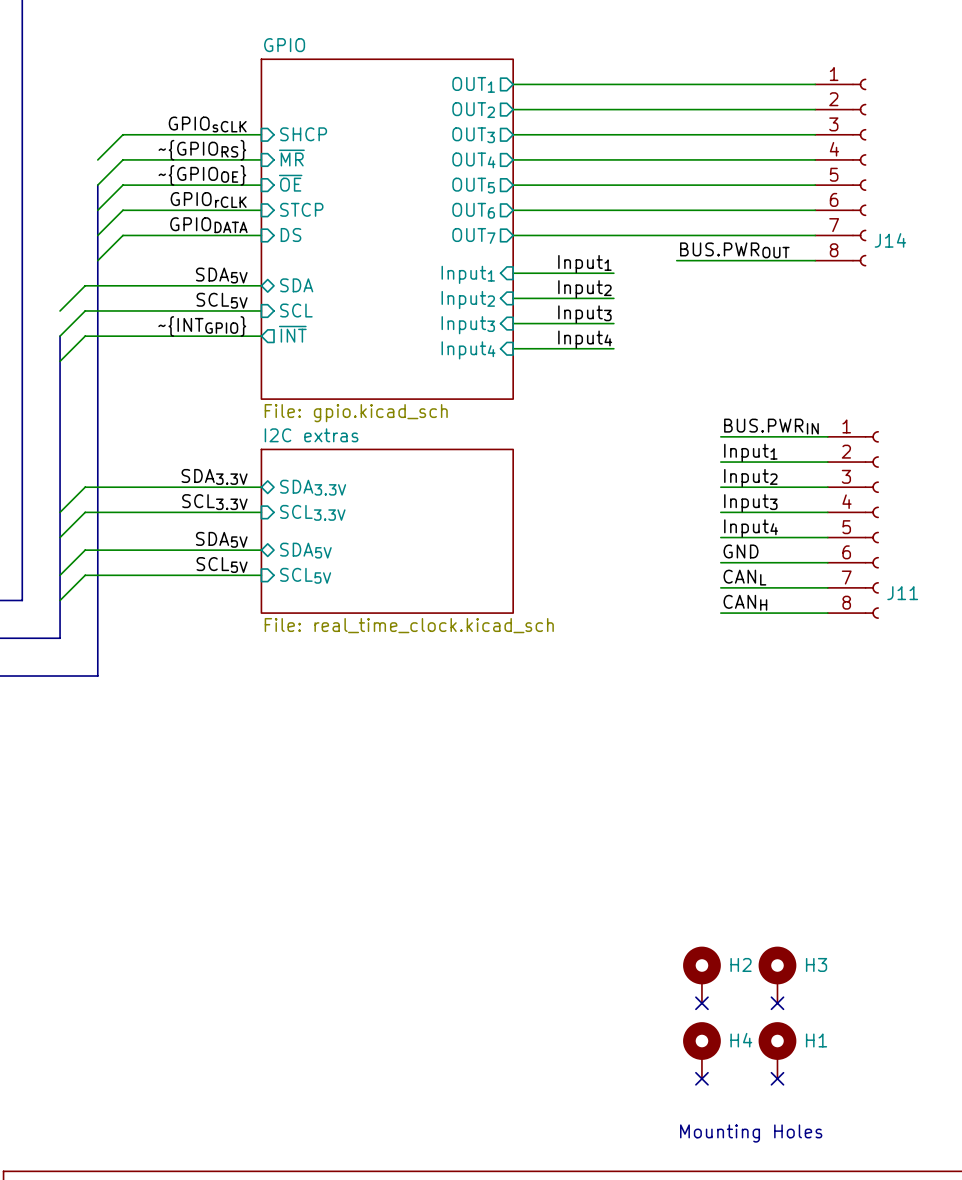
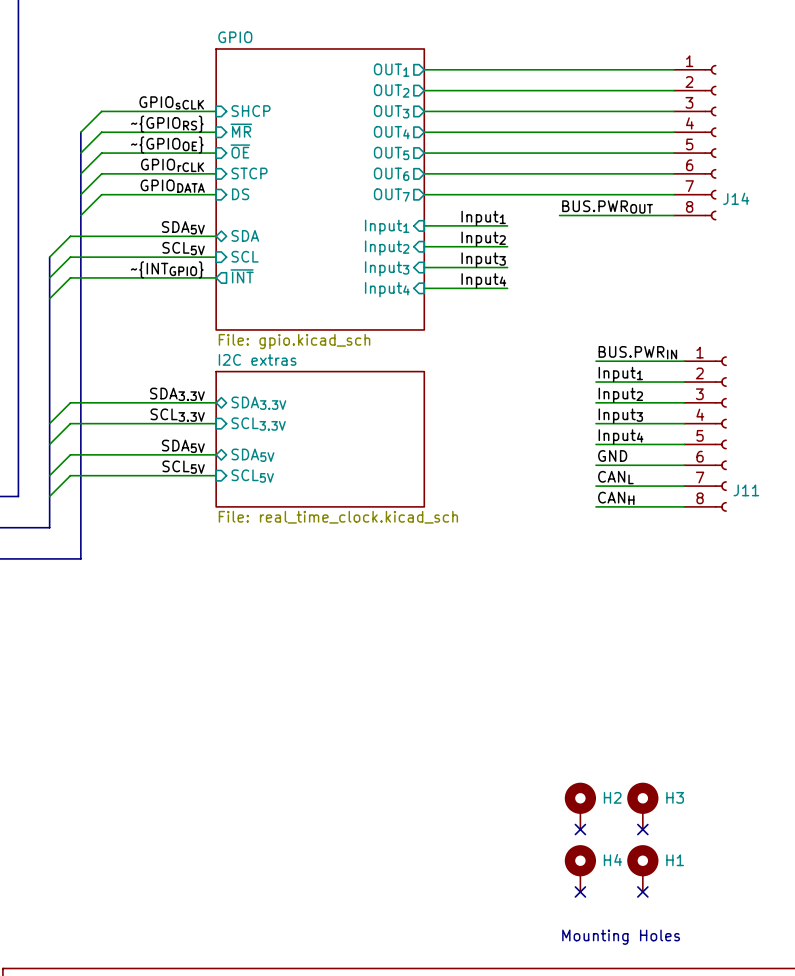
bus: none -> (80, 132) (80, 153)
bus: none -> (49, 257) (49, 277)

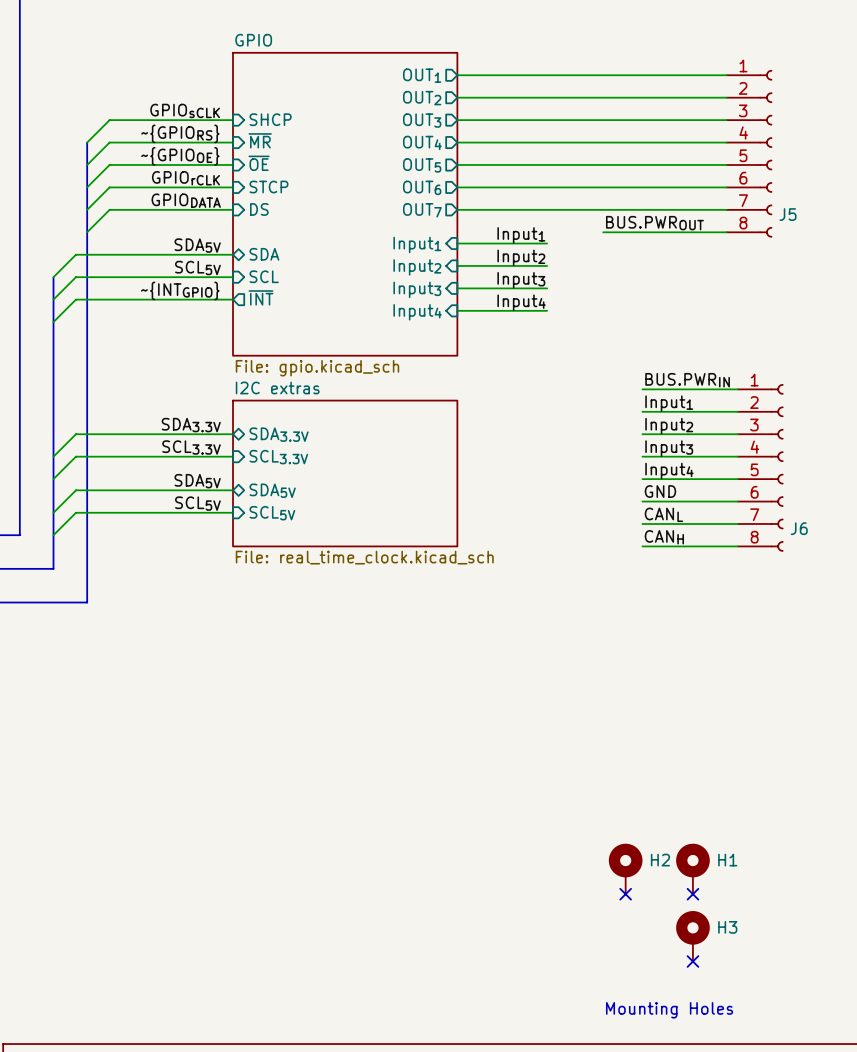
J14 name: J14 (736, 198) -> J5 (788, 214)
J11 name: J11 (746, 490) -> J6 (799, 528)
H3 name: H3 (675, 797) -> H1 (727, 860)
H1 name: H1 (675, 860) -> H3 (727, 927)
H4: (580, 868) -> none
no-connect mark: (580, 891) -> none

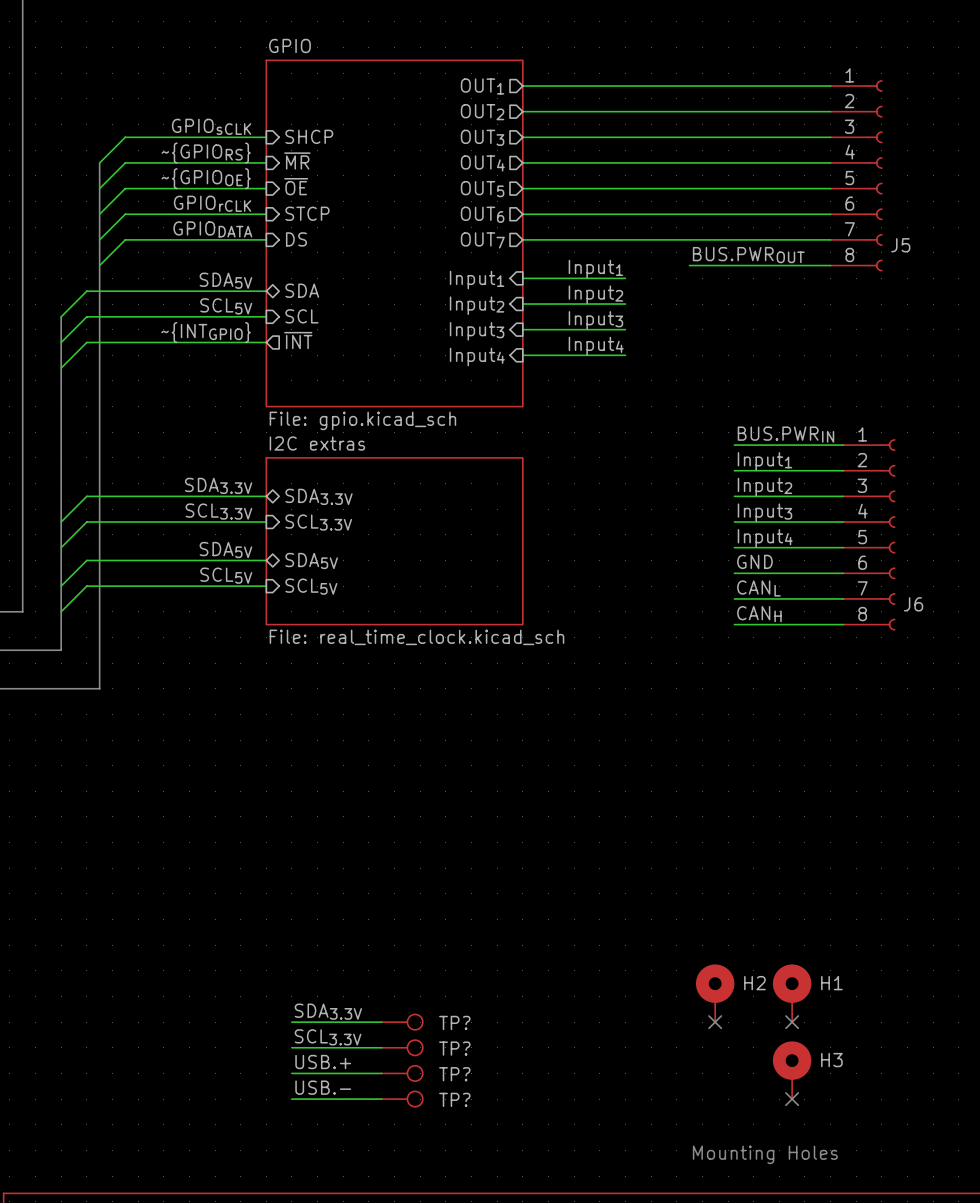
label: none -> SDA3.3V (328, 1011)
wire: none -> (291, 1022) (381, 1022)
TP?: none -> (402, 1022)
label: none -> SCL3.3V (328, 1037)
wire: none -> (291, 1047) (381, 1047)
TP?: none -> (402, 1047)
label: none -> USB.+ (323, 1061)
wire: none -> (291, 1073) (381, 1073)
TP?: none -> (402, 1073)
label: none -> USB.- (323, 1087)
wire: none -> (291, 1099) (381, 1099)
TP?: none -> (402, 1099)

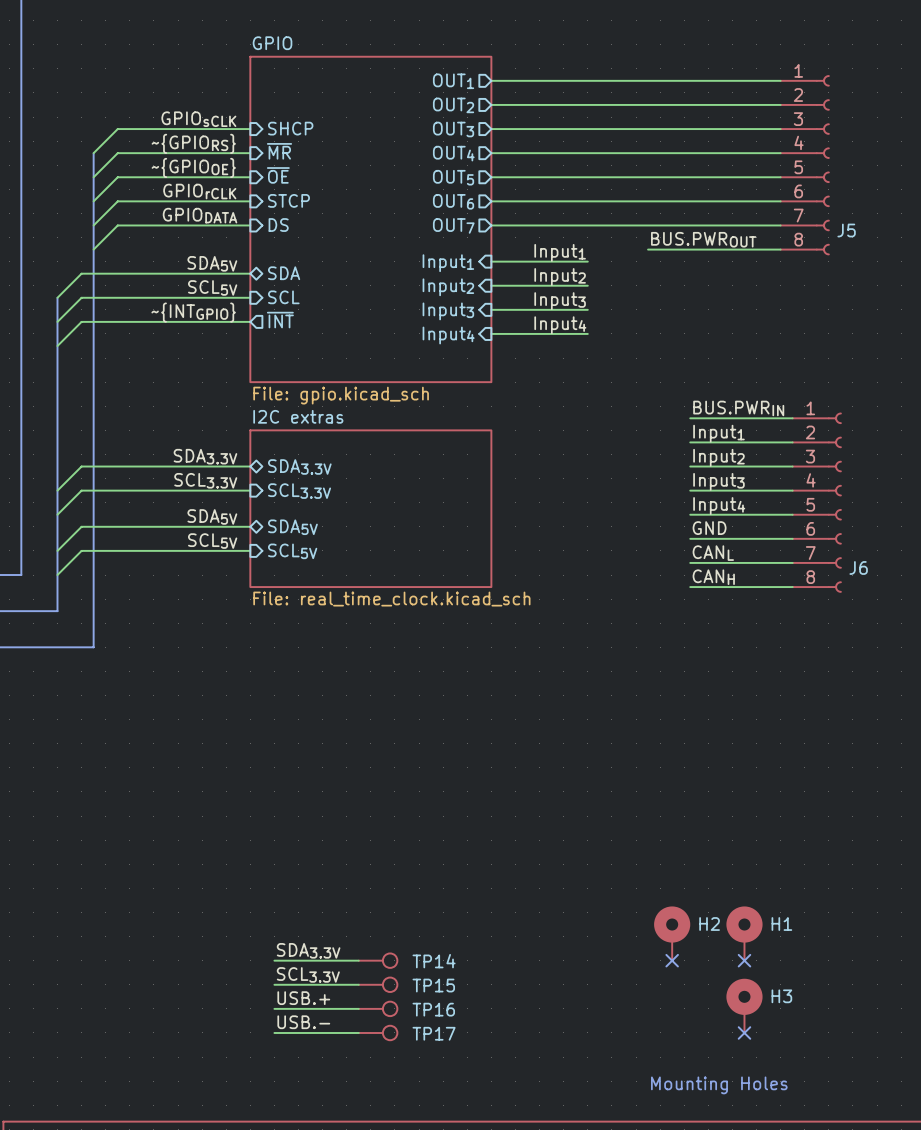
TP? name: TP? (454, 1022) -> TP14 (434, 961)
TP? name: TP? (454, 1048) -> TP15 (433, 985)
TP? name: TP? (454, 1074) -> TP16 (433, 1009)
TP? name: TP? (454, 1099) -> TP17 (434, 1033)

